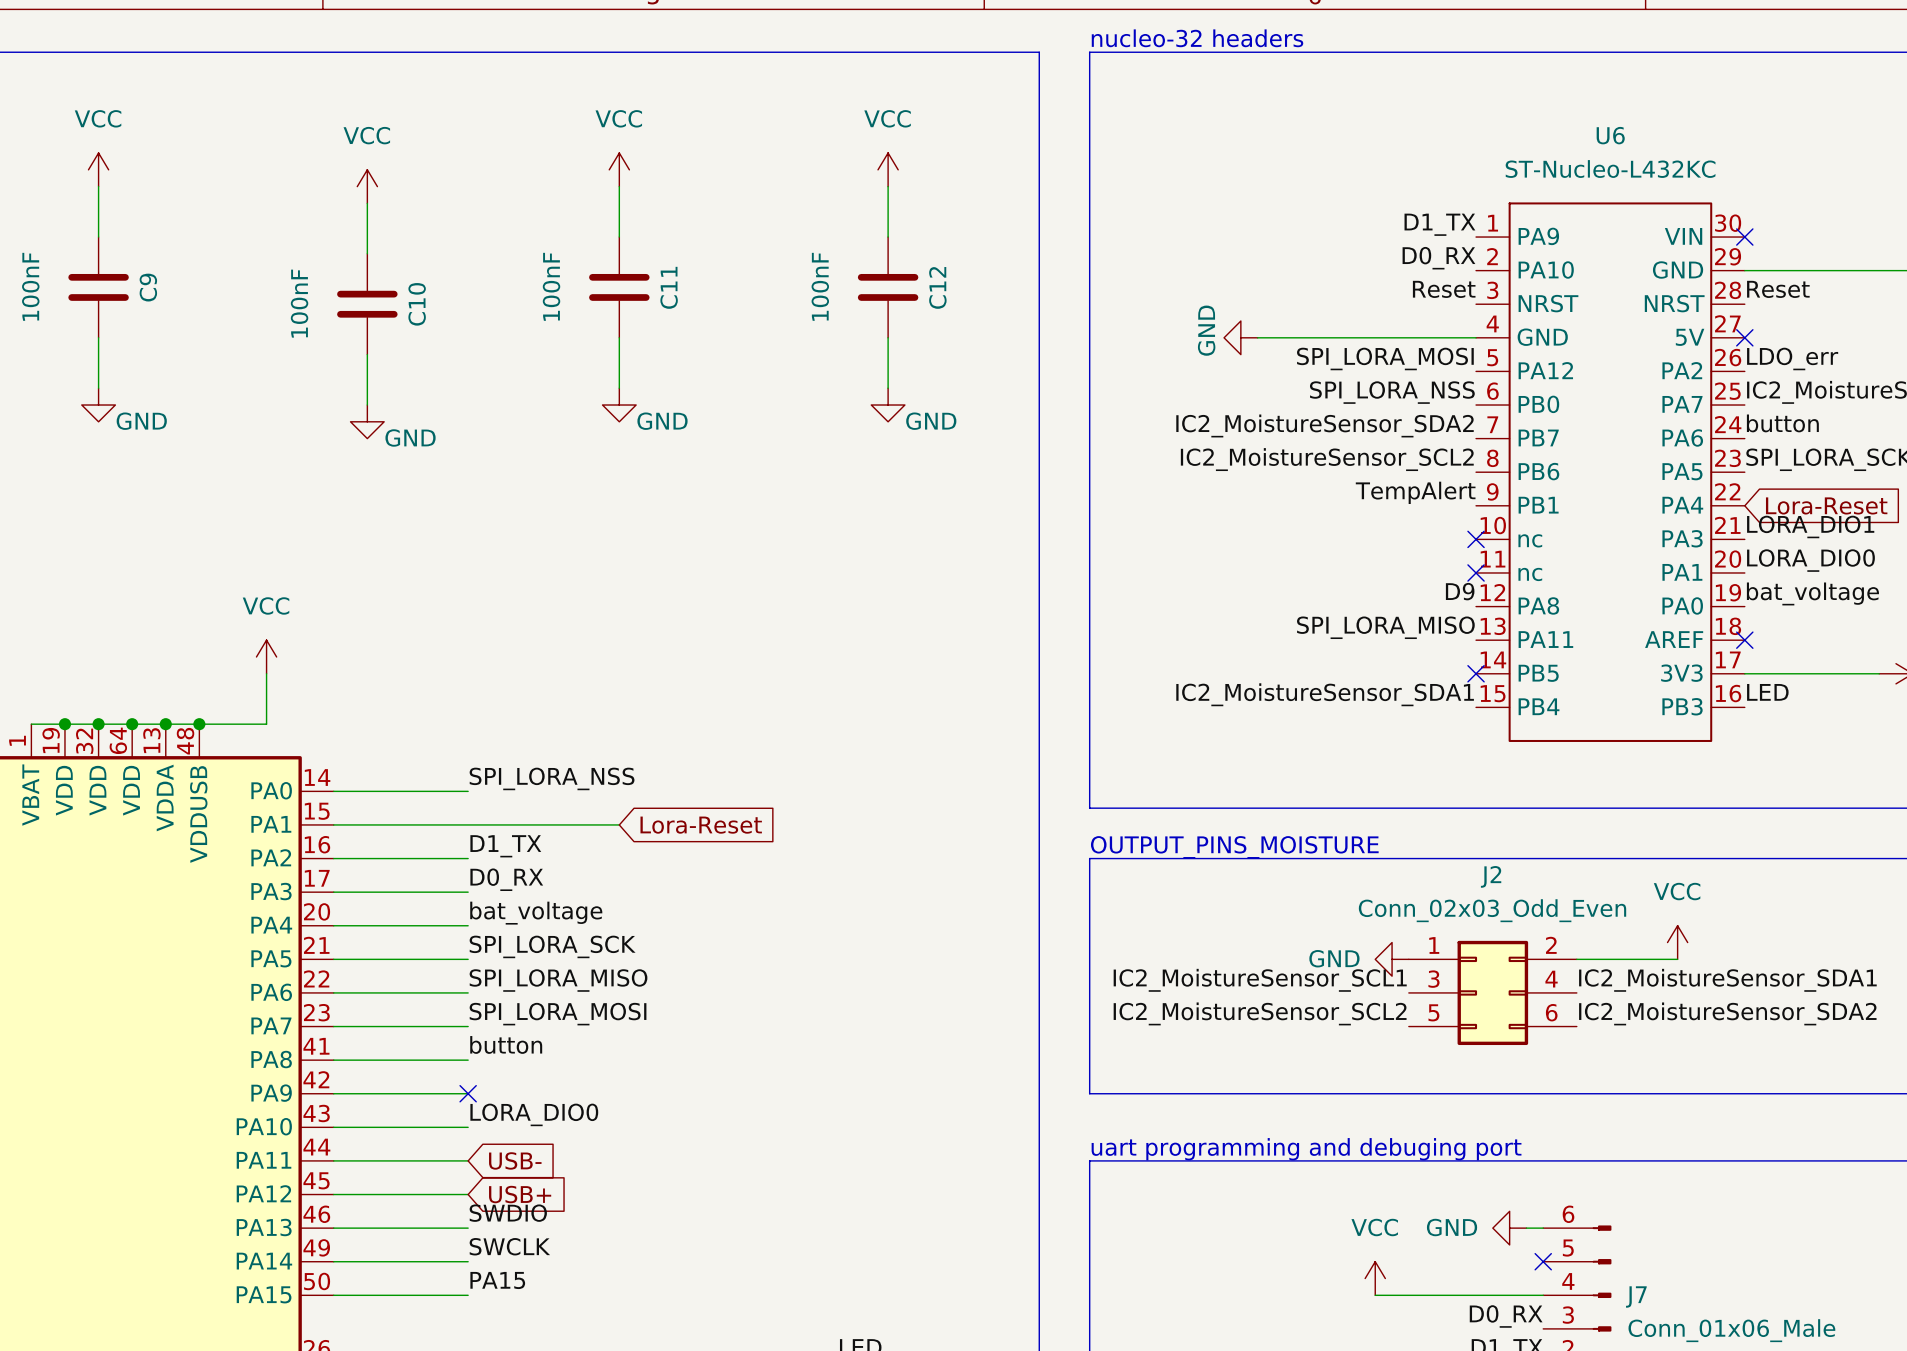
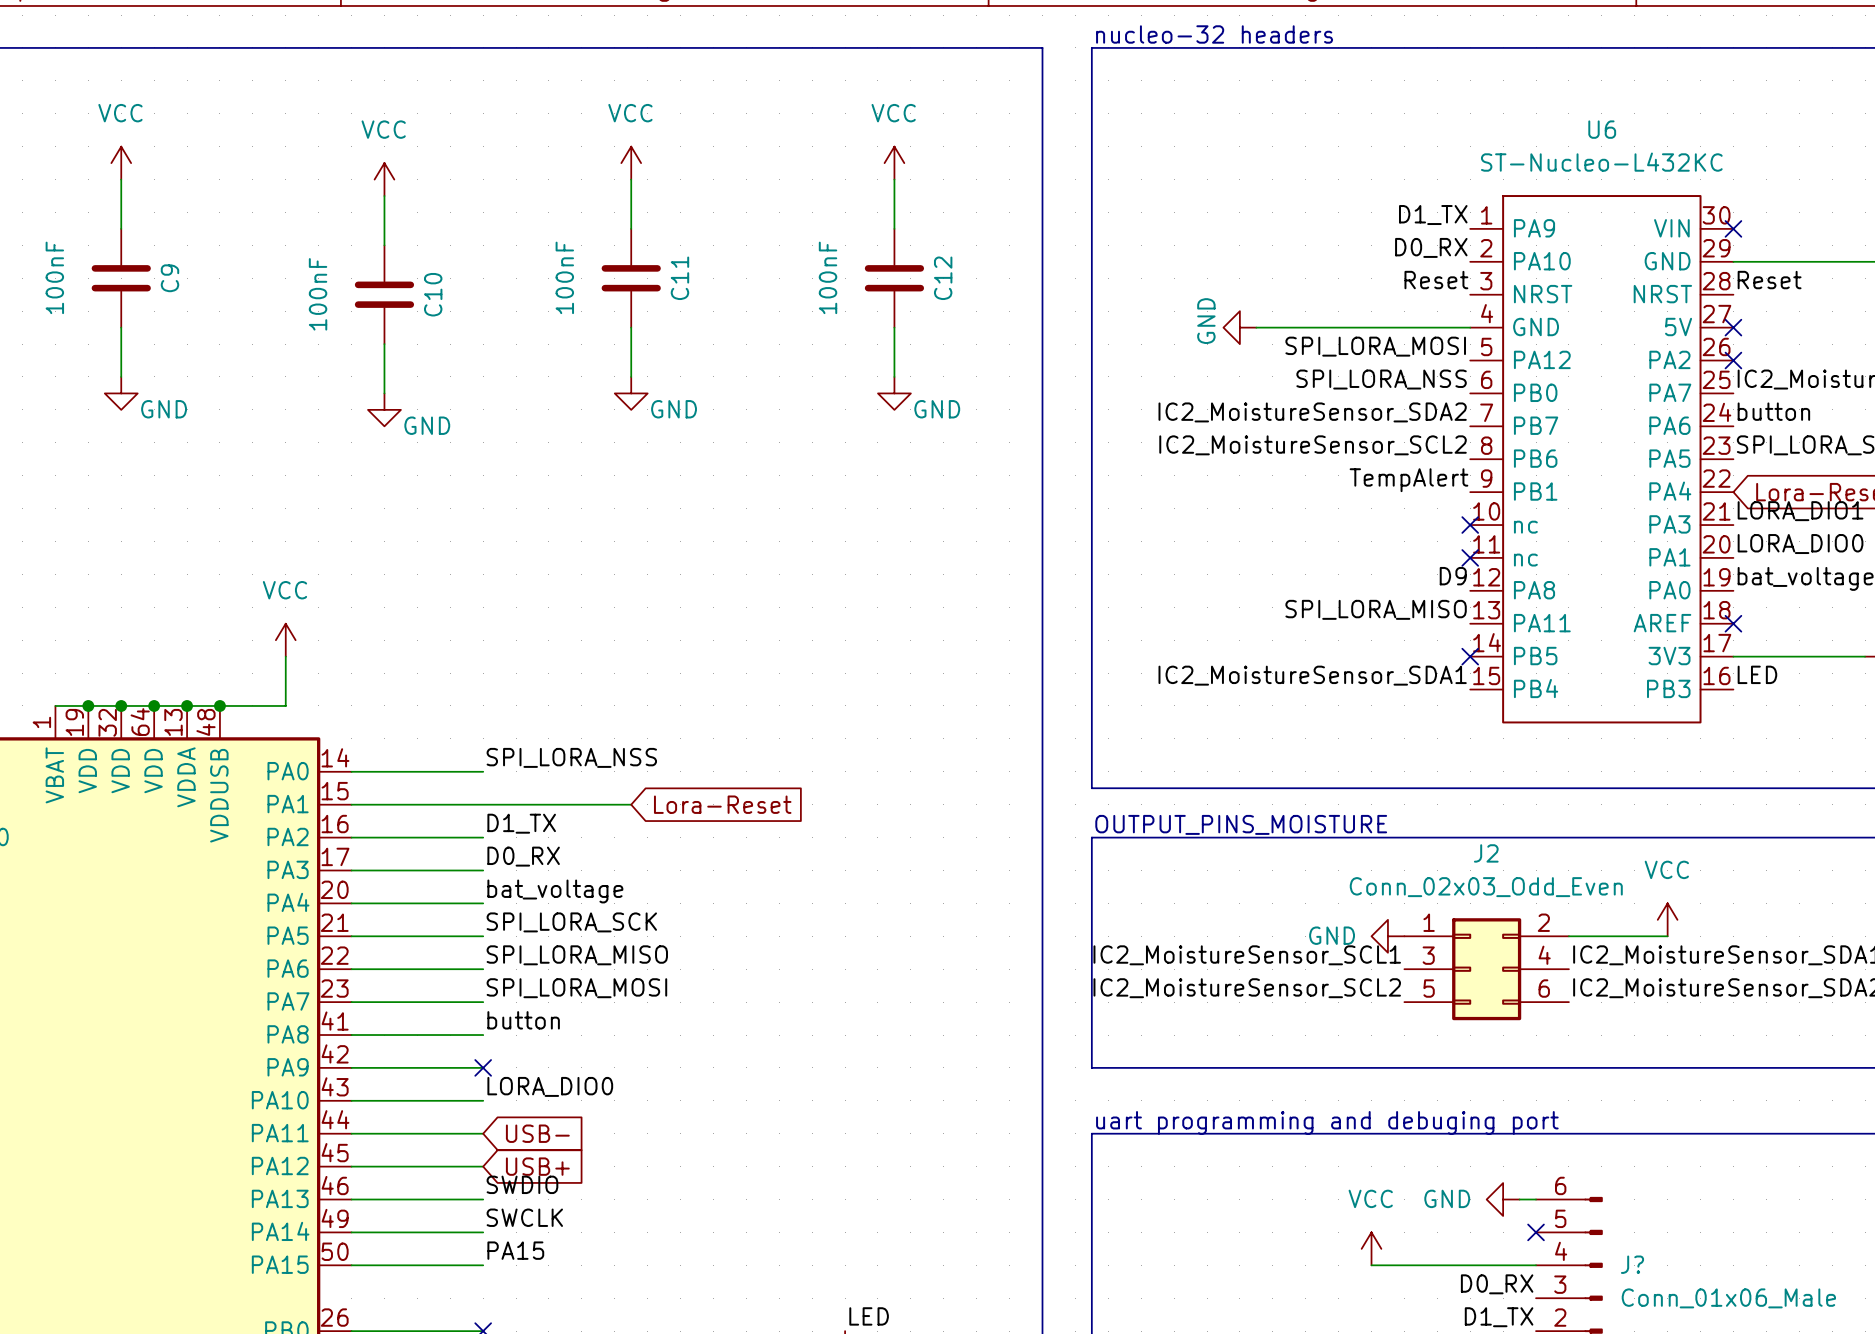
label: LDO_err (1792, 358) -> none
no-connect mark: none -> (1733, 360)
J7 name: J7 (1636, 1296) -> J? (1632, 1264)

